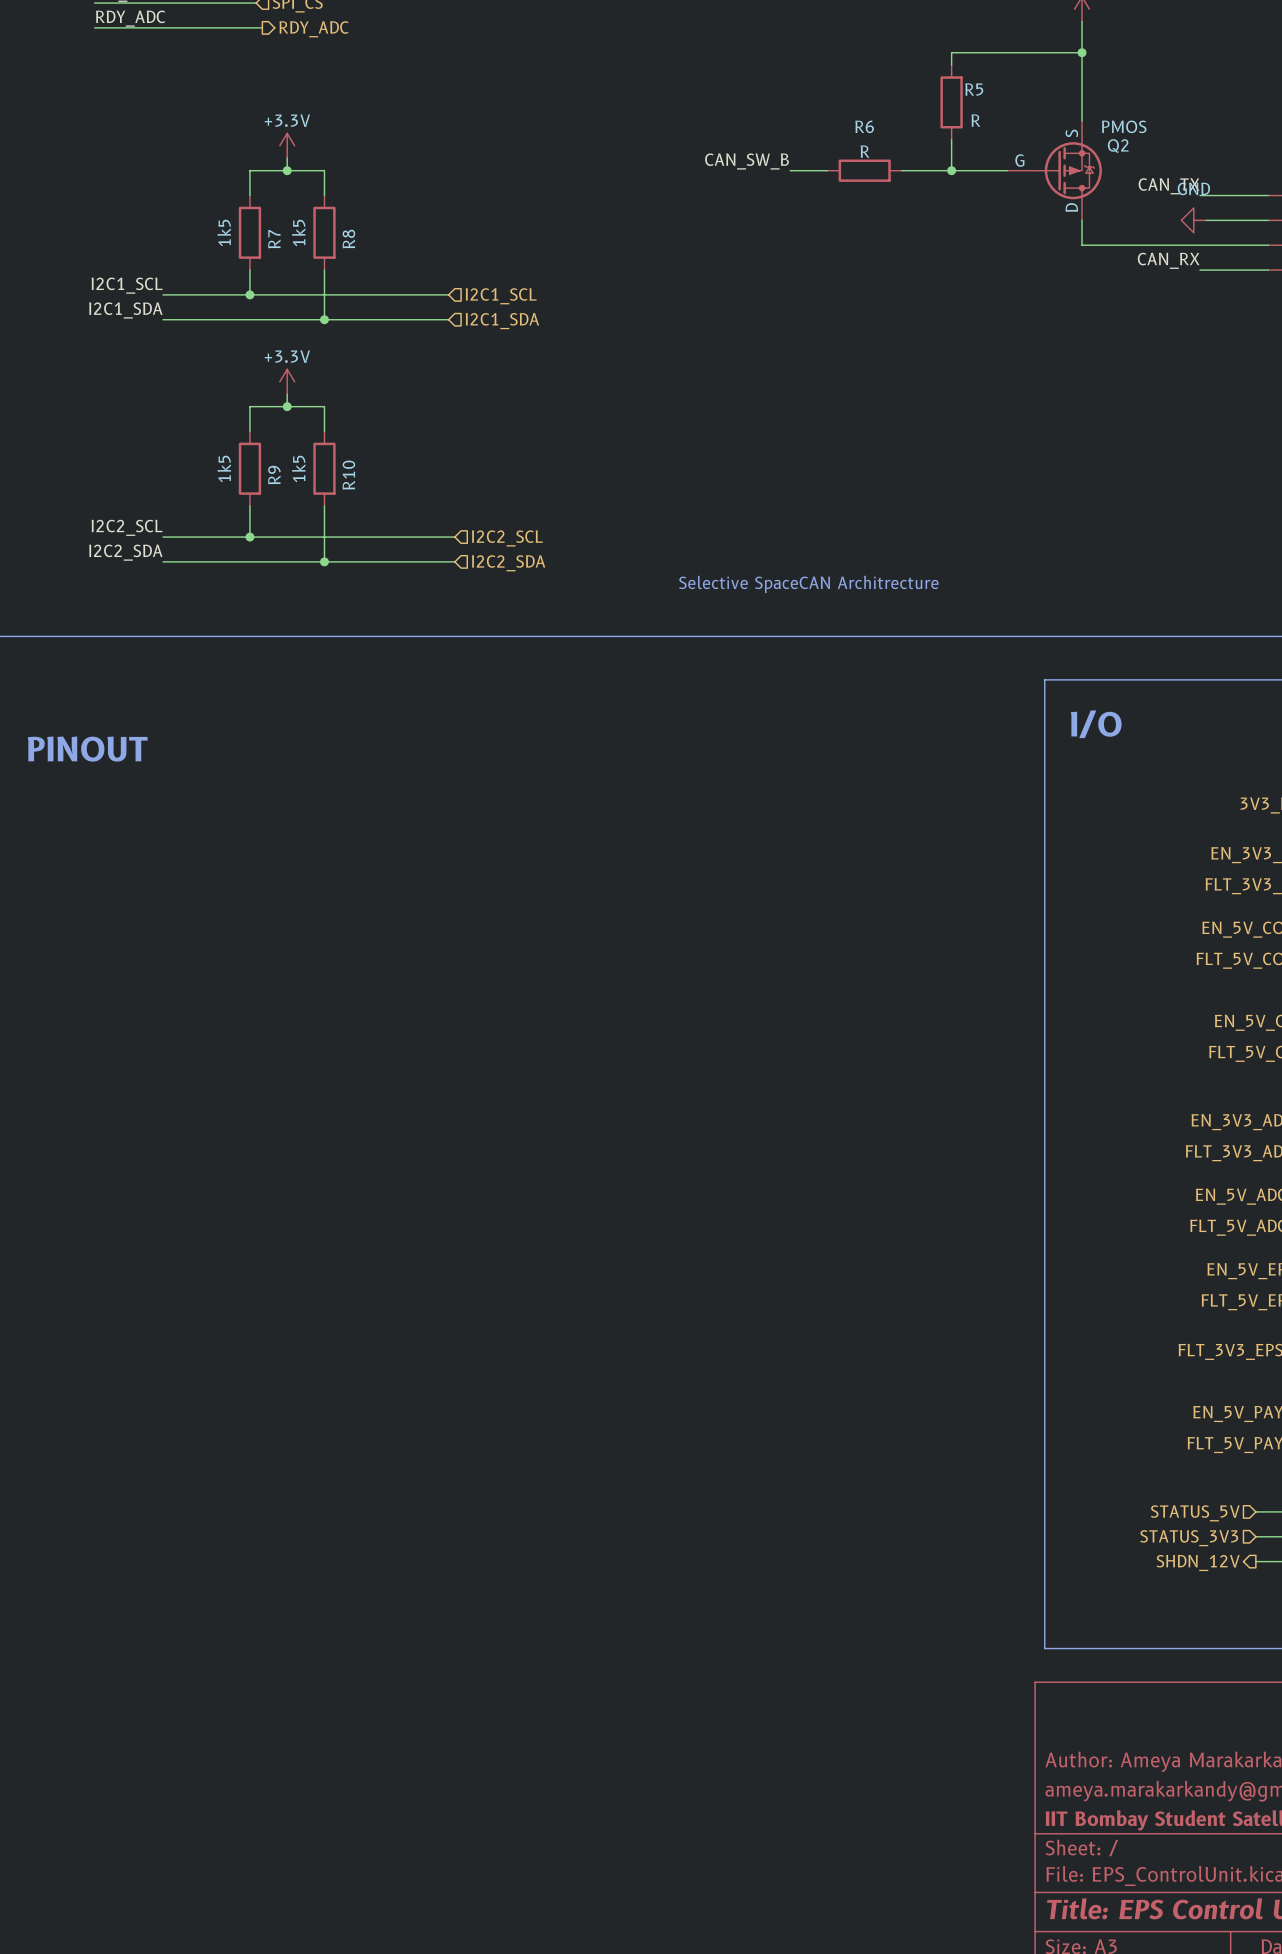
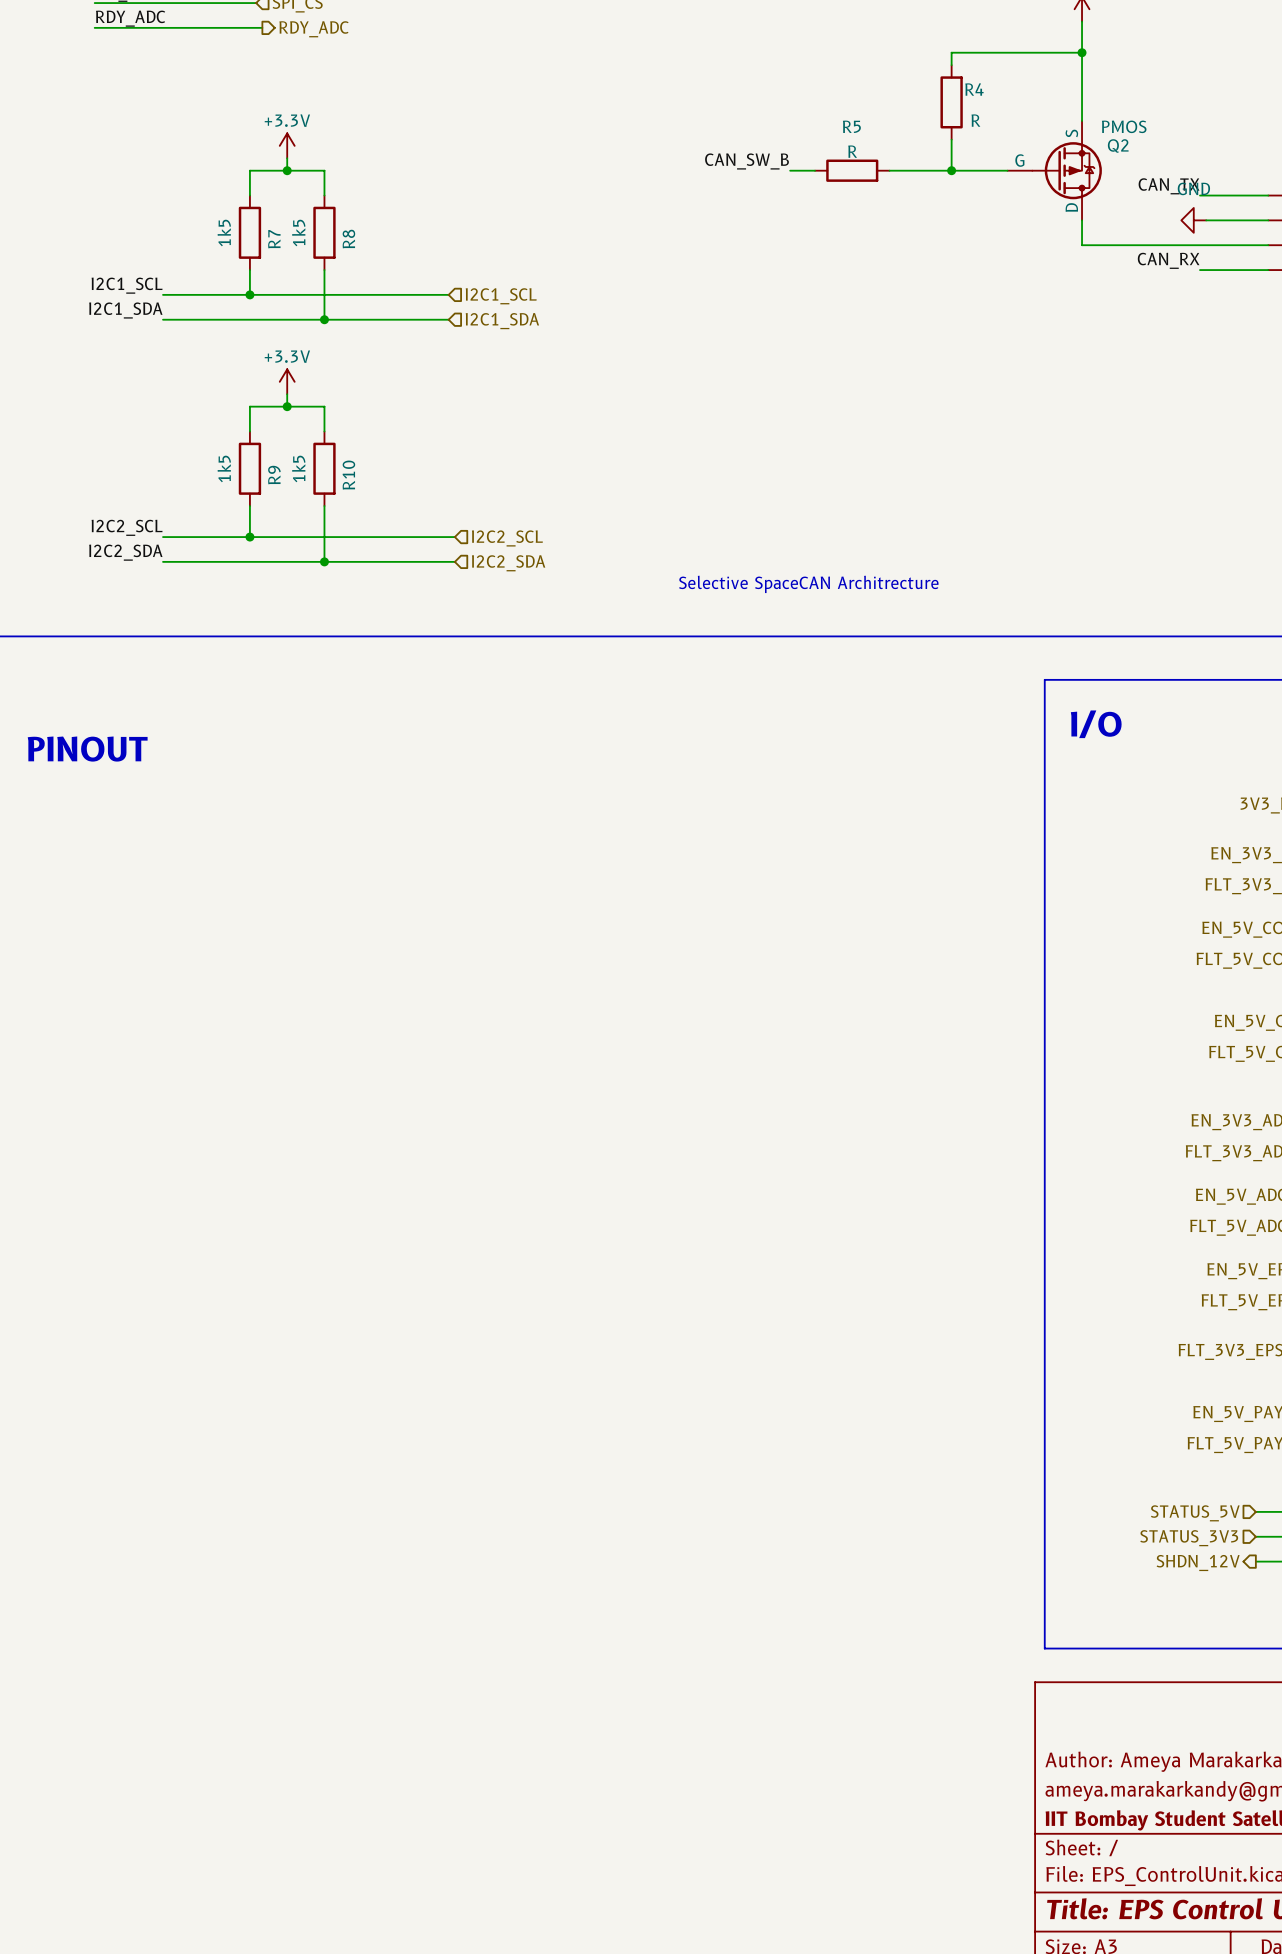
R5 name: R5 (974, 89) -> R4 (974, 89)
R5: none -> R (852, 170)
R6: R (864, 170) -> none

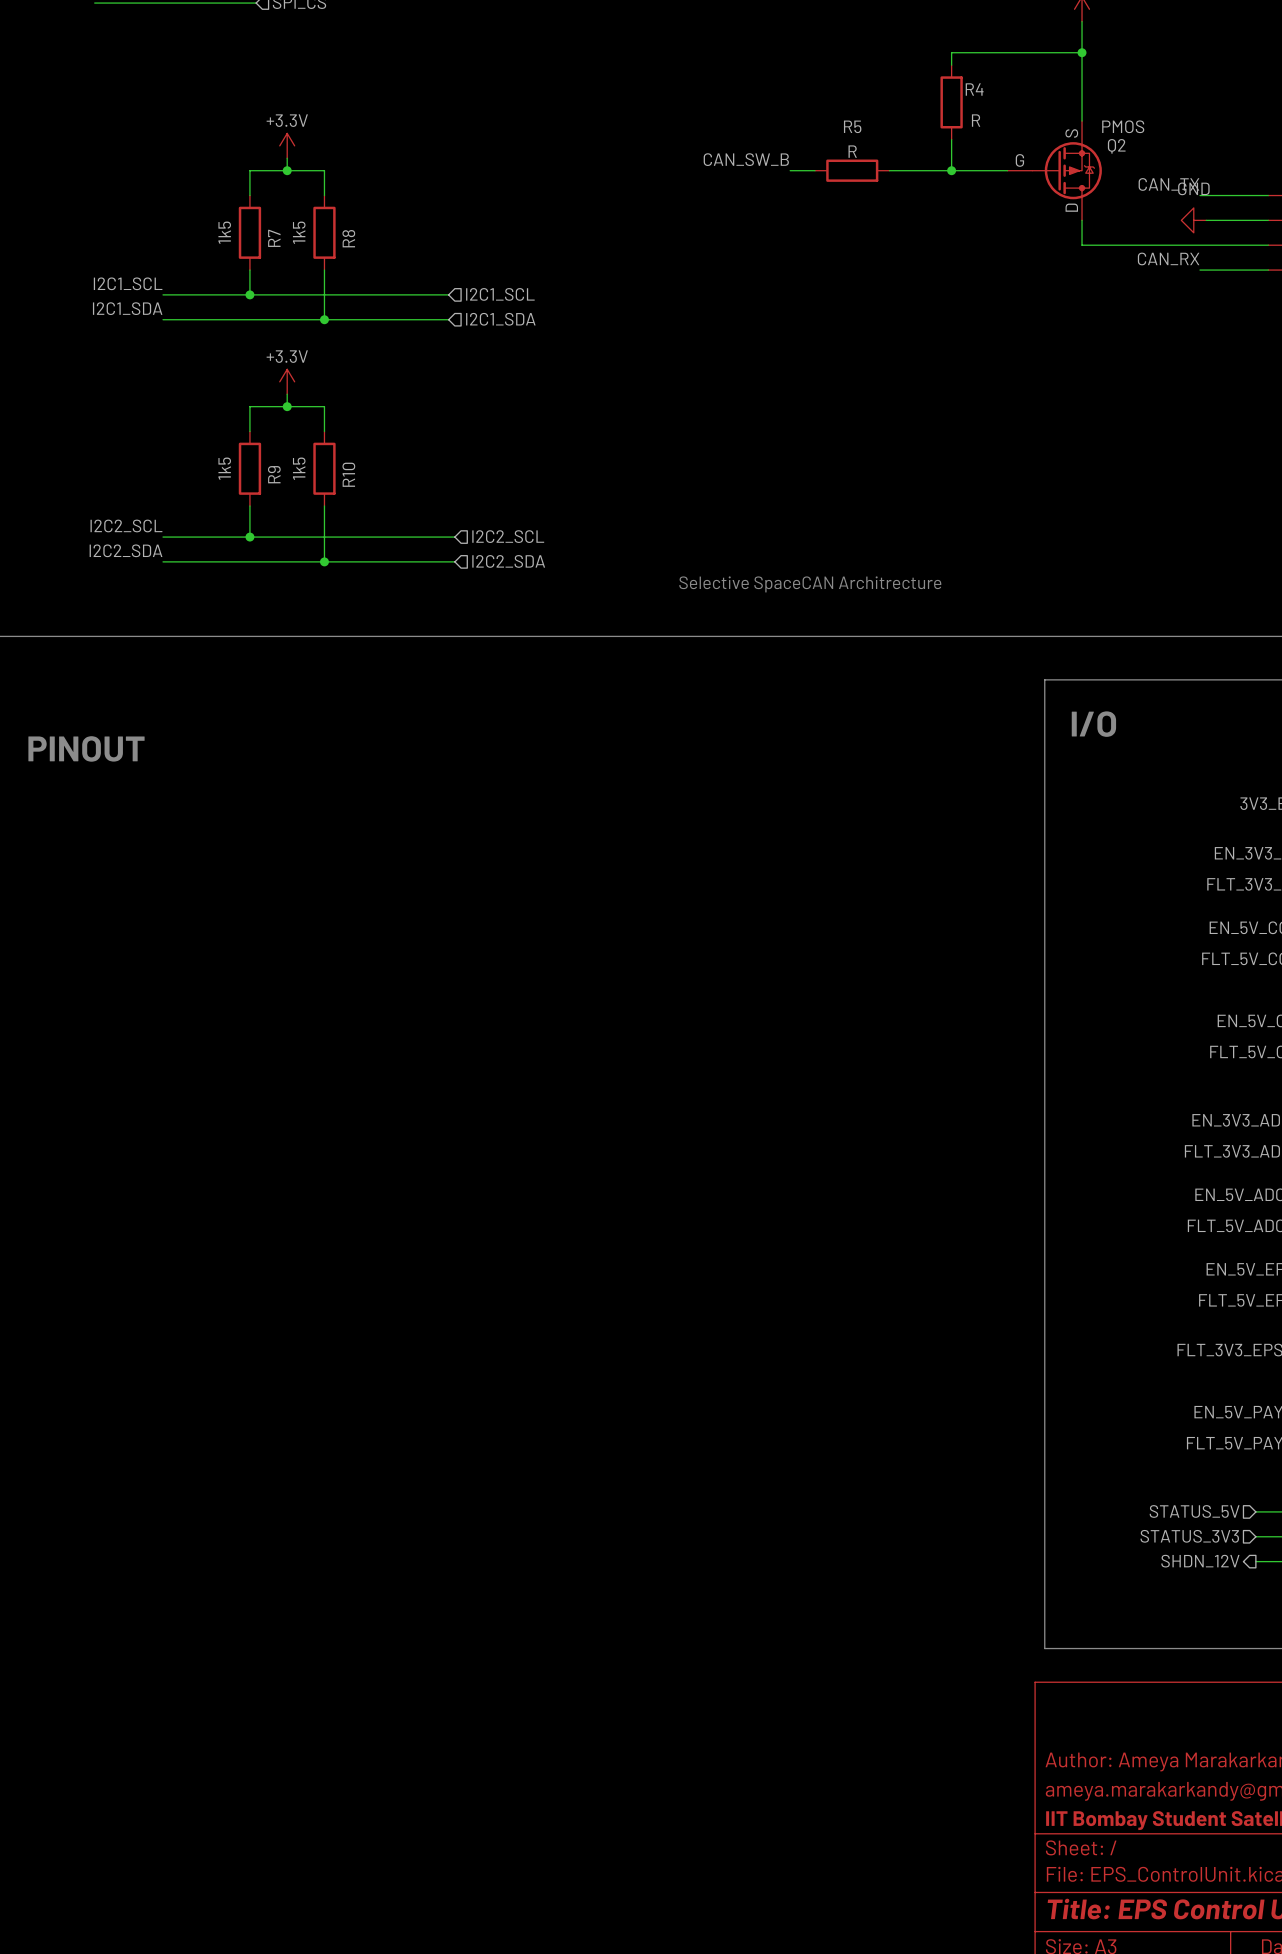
label: RDY_ADC (130, 18) -> none
wire: (94, 27) (262, 27) -> none
hierarchical label: RDY_ADC (314, 29) -> none

